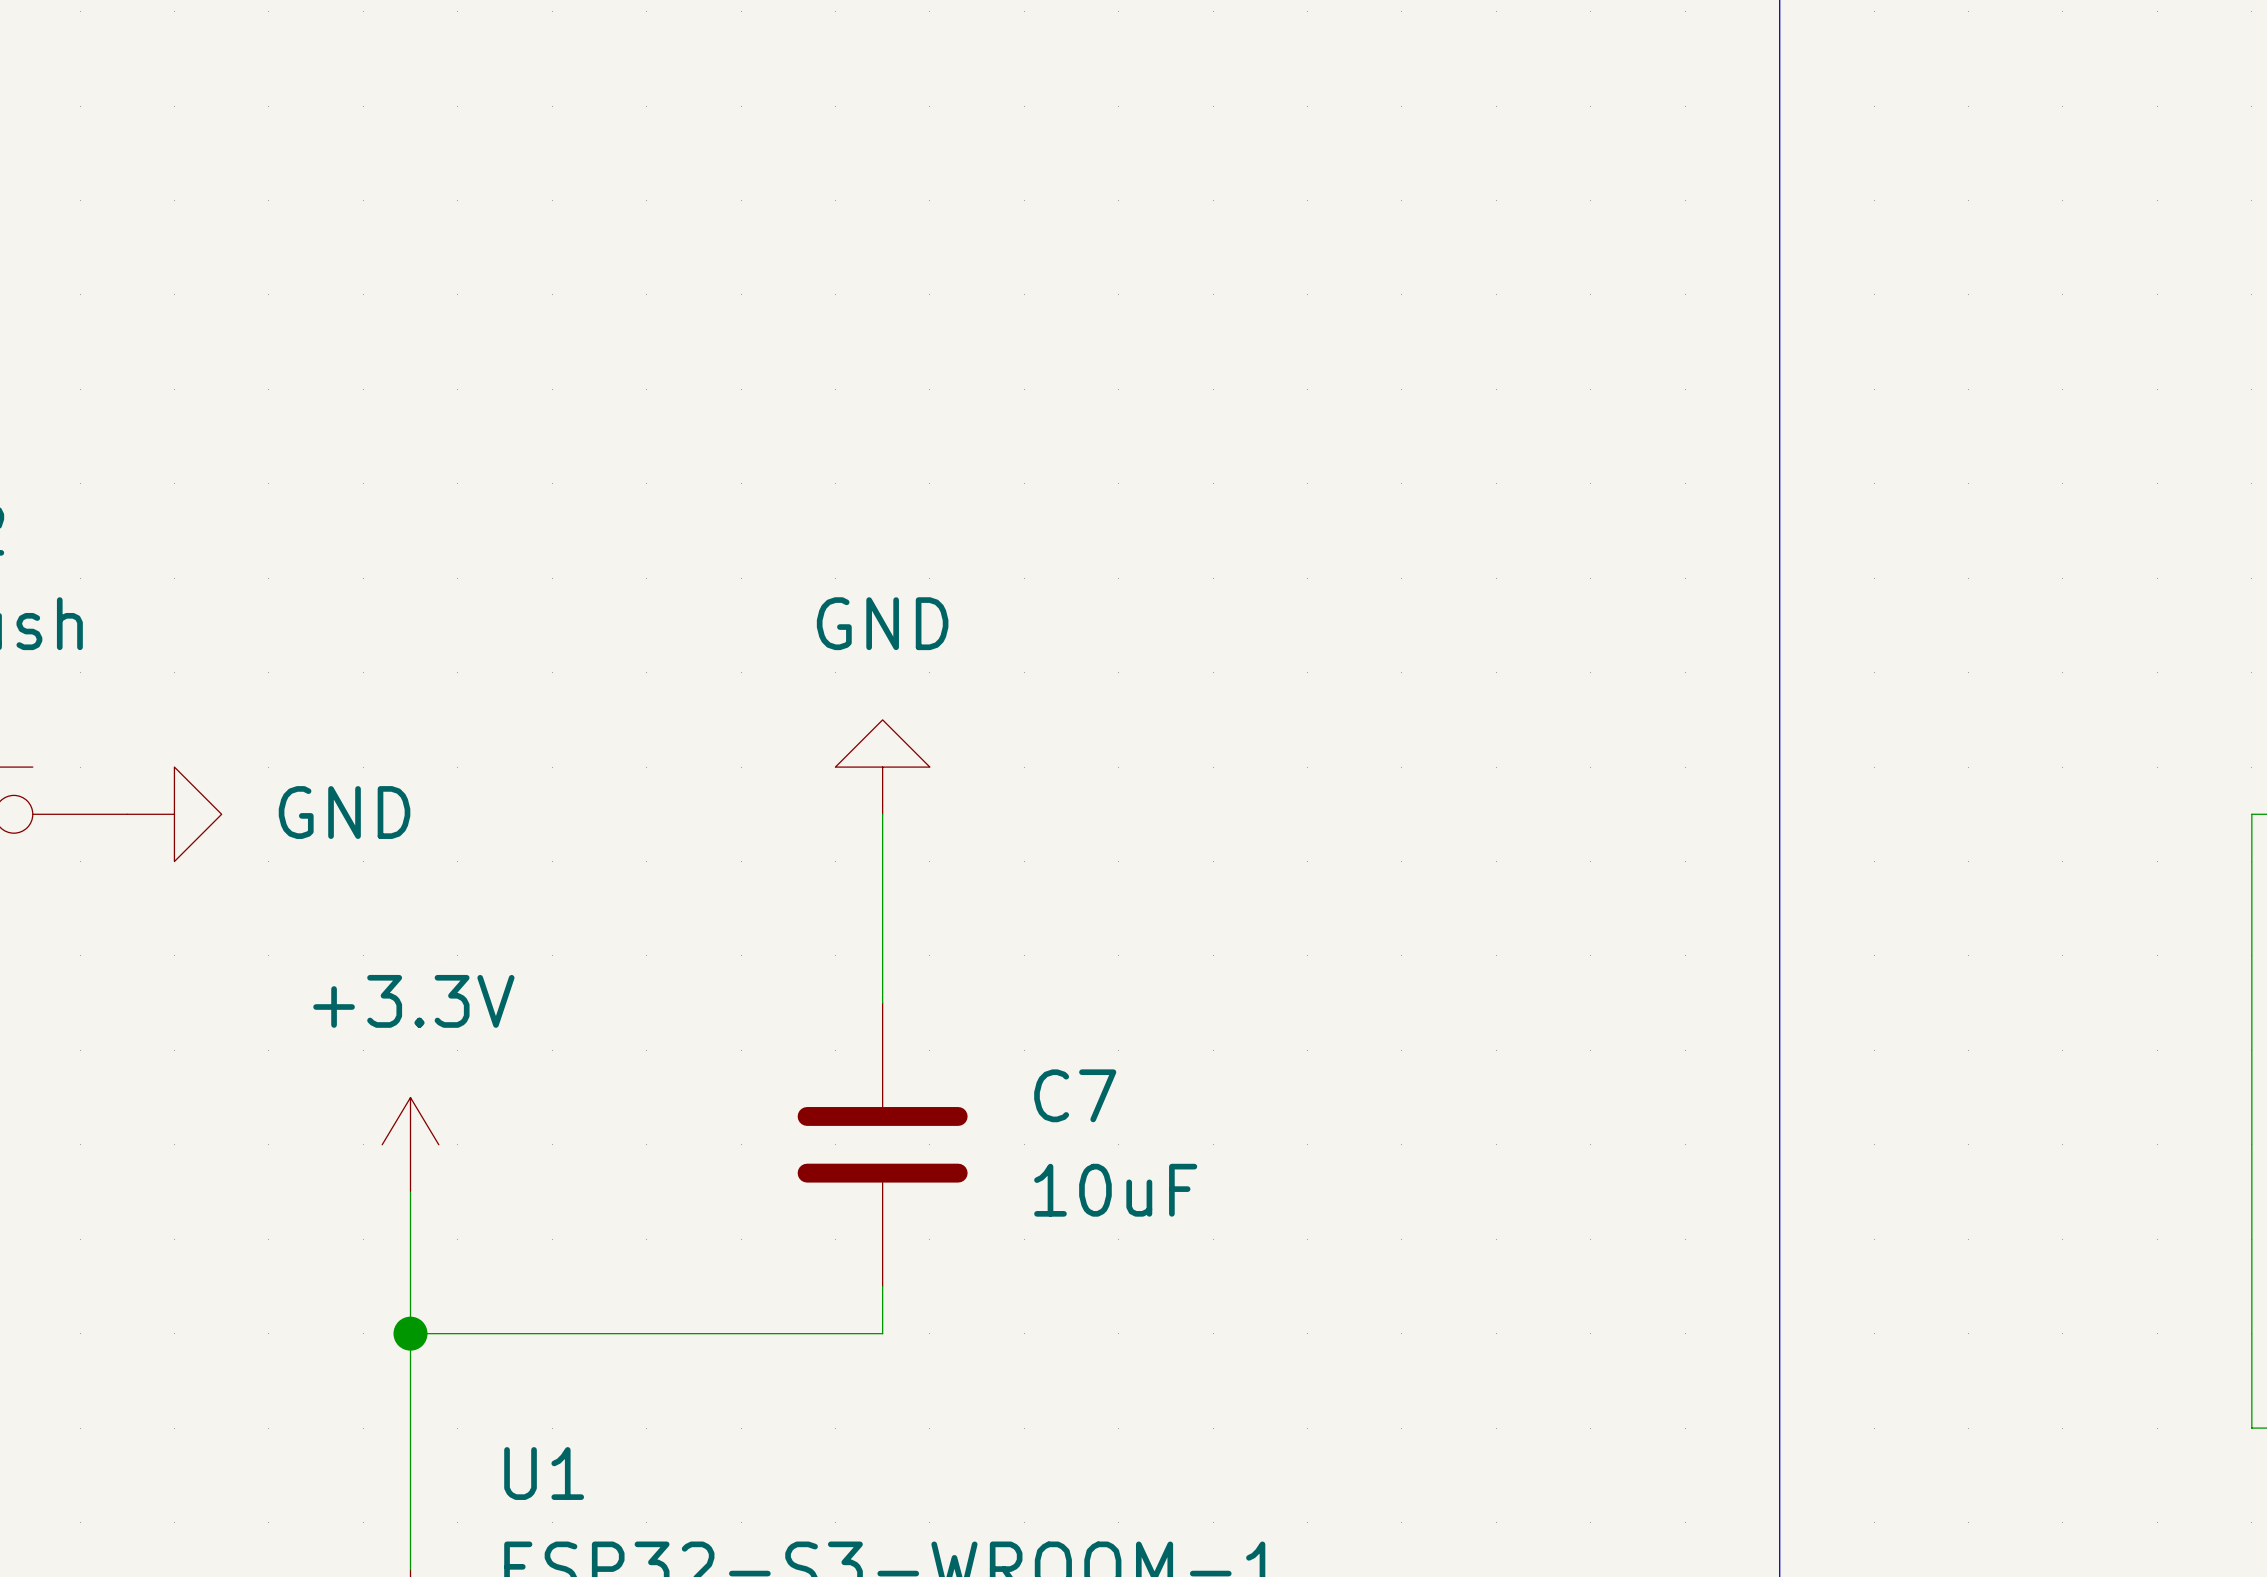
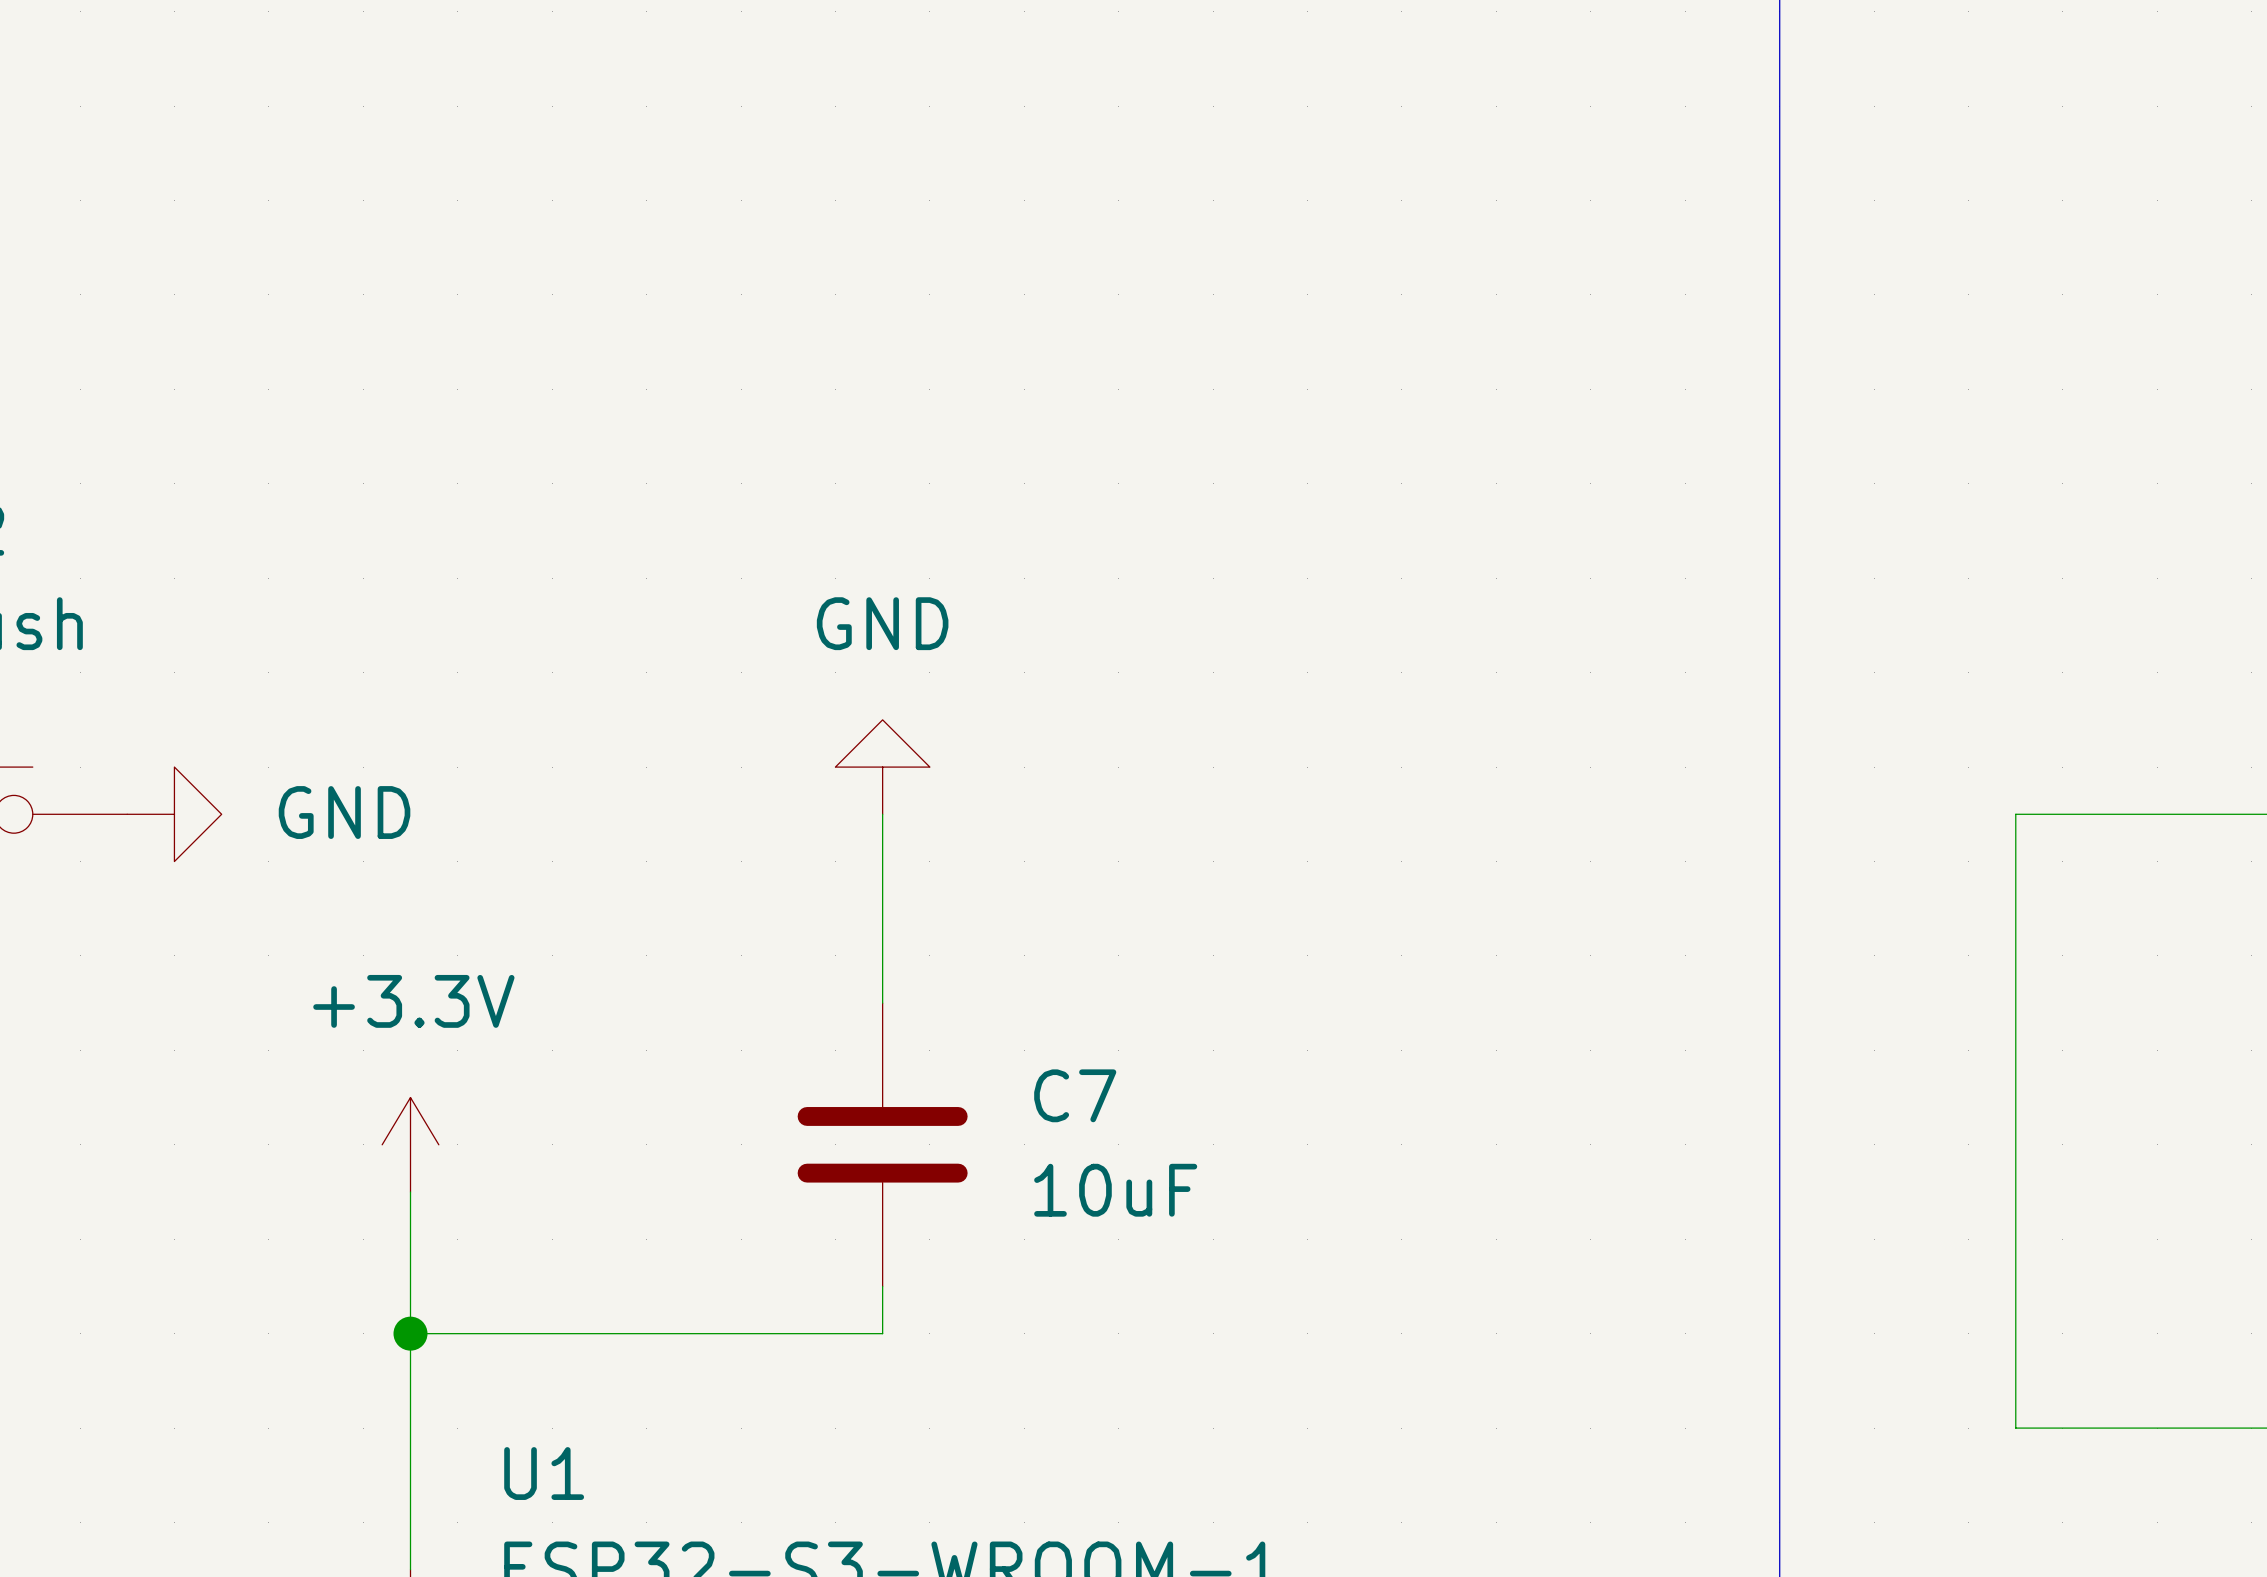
wire: (2251, 814) (2251, 1428) -> (2251, 814) (2015, 814) (2015, 1428) (2251, 1428)

